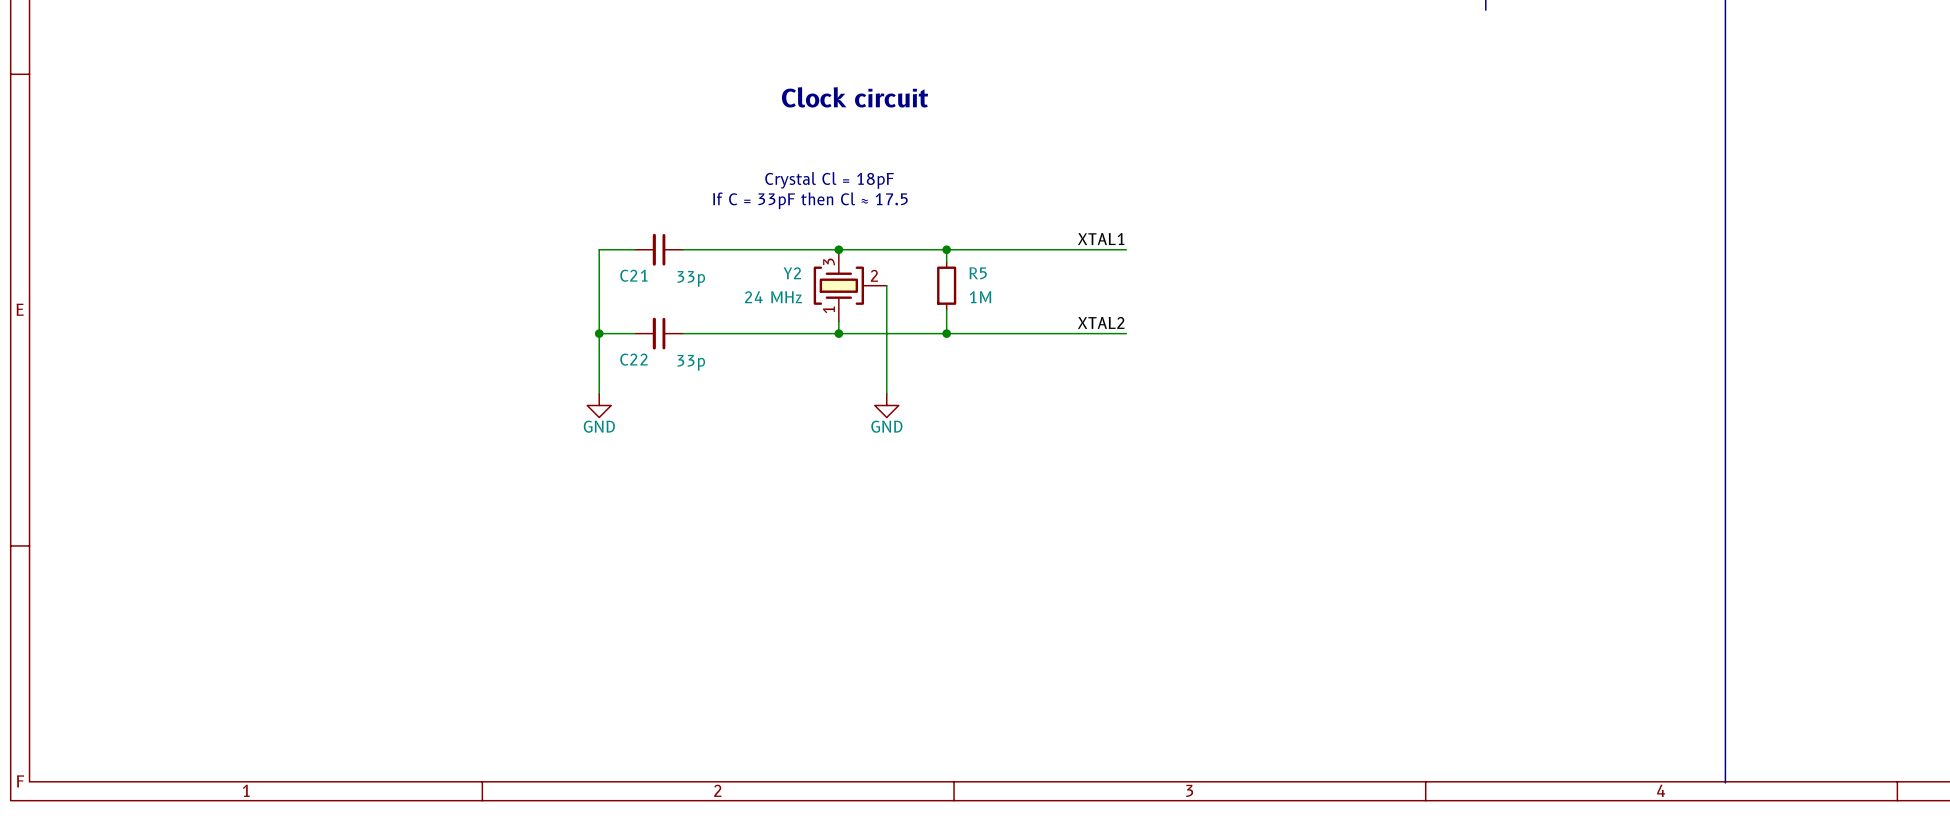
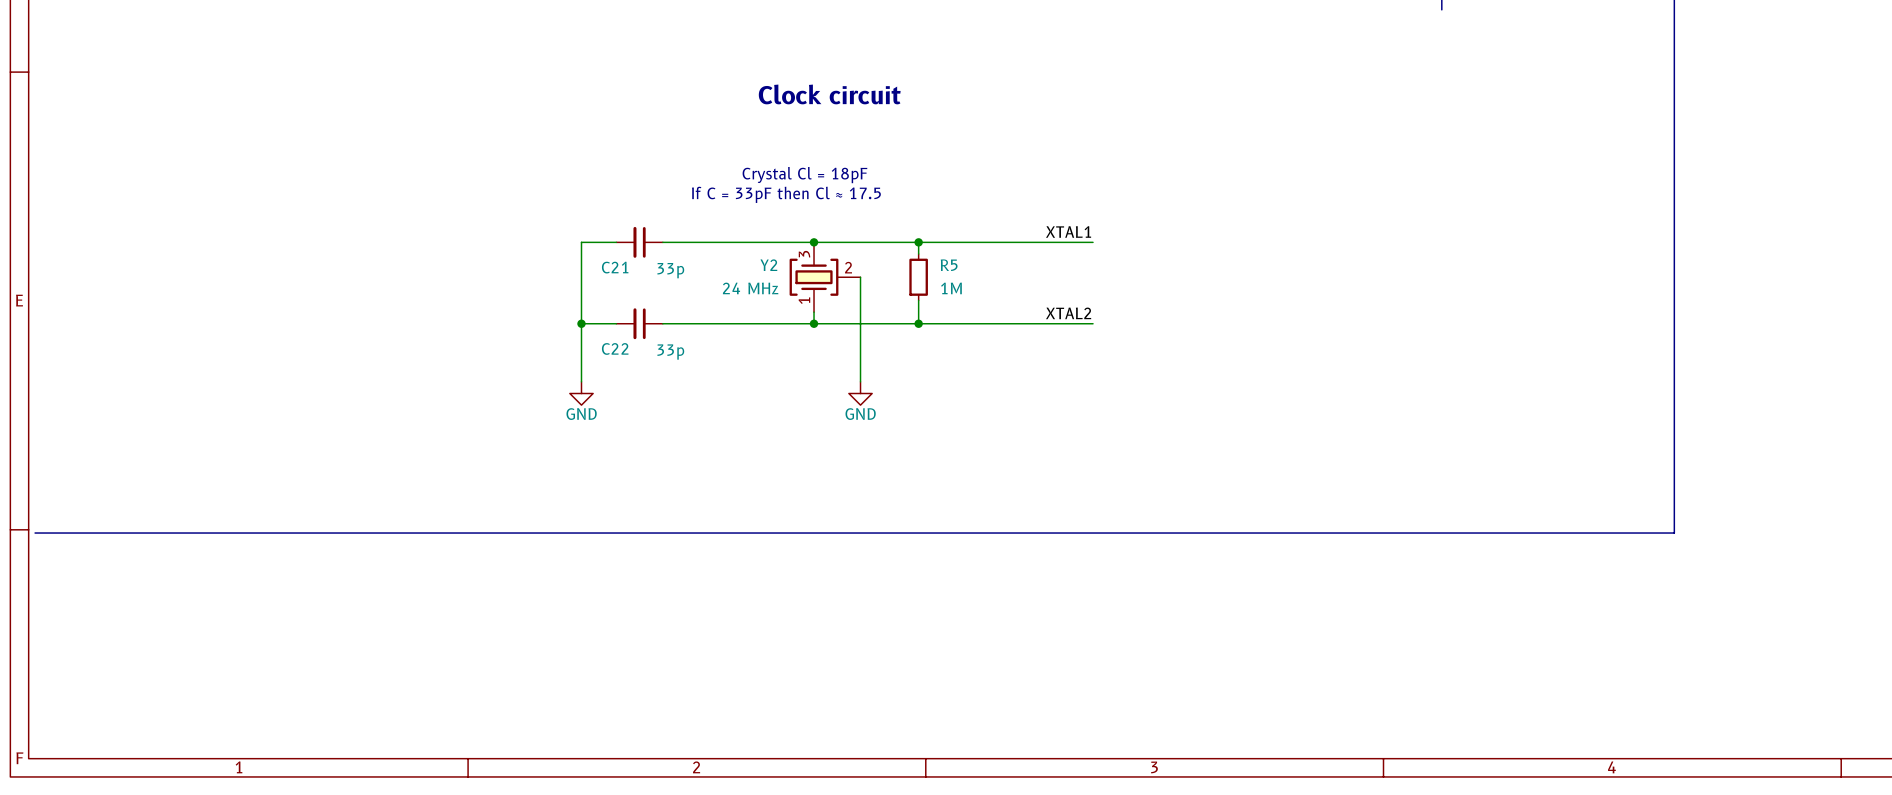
line: (1725, 549) (1725, 782) -> (1674, 533) (35, 533)

